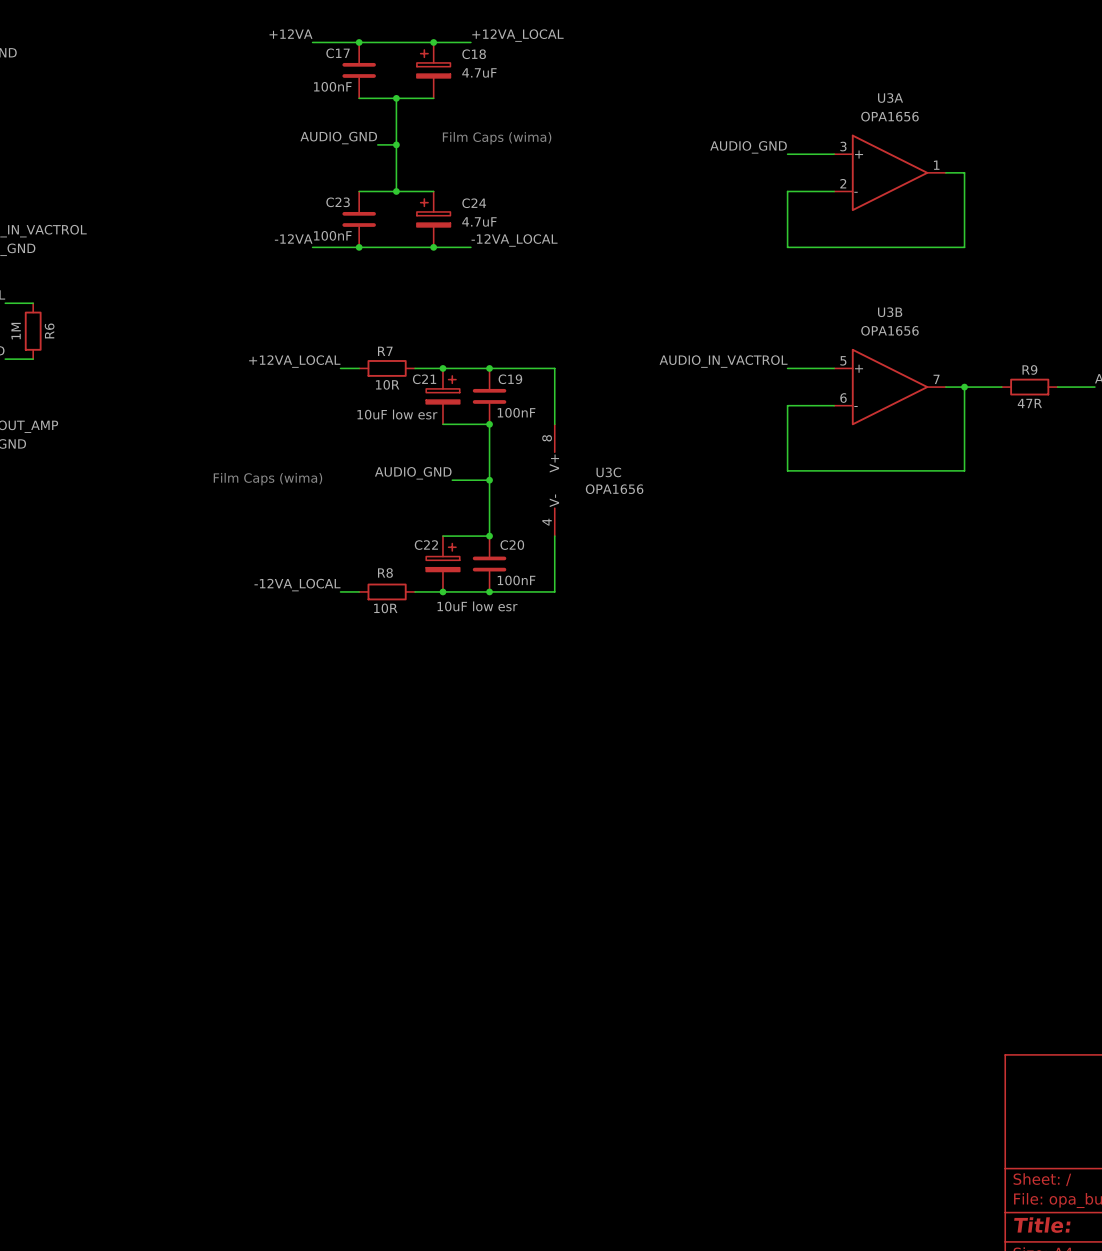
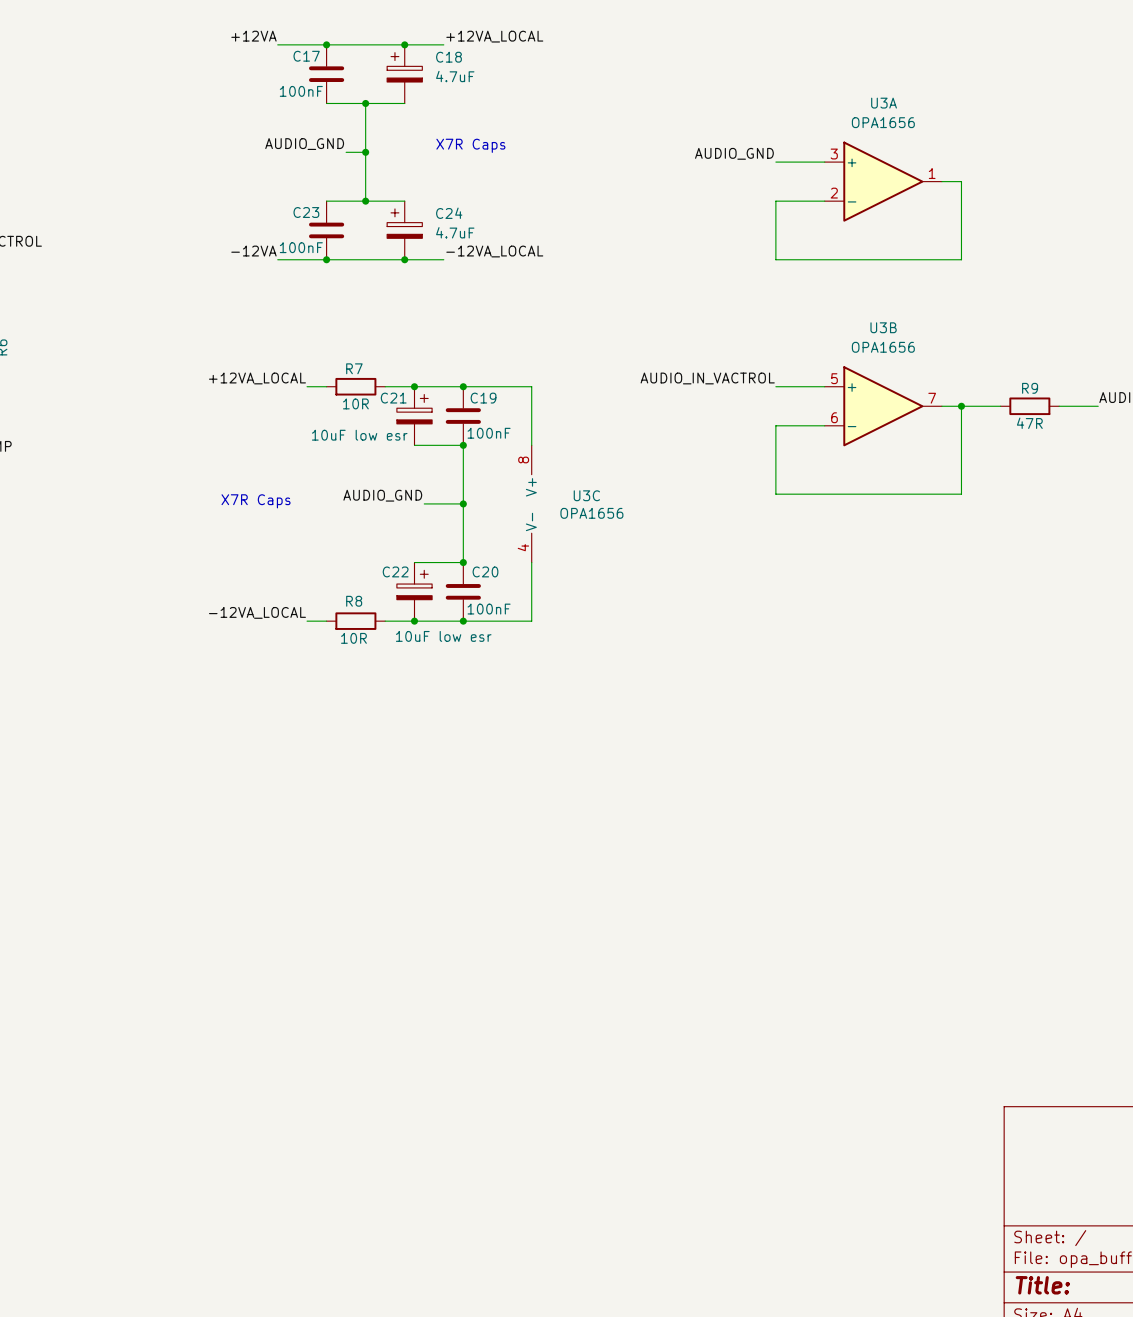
text: Film Caps (wima) (497, 138) -> X7R Caps (470, 145)
text: none -> X7R Caps (256, 501)
text: Film Caps (wima) (267, 479) -> none

